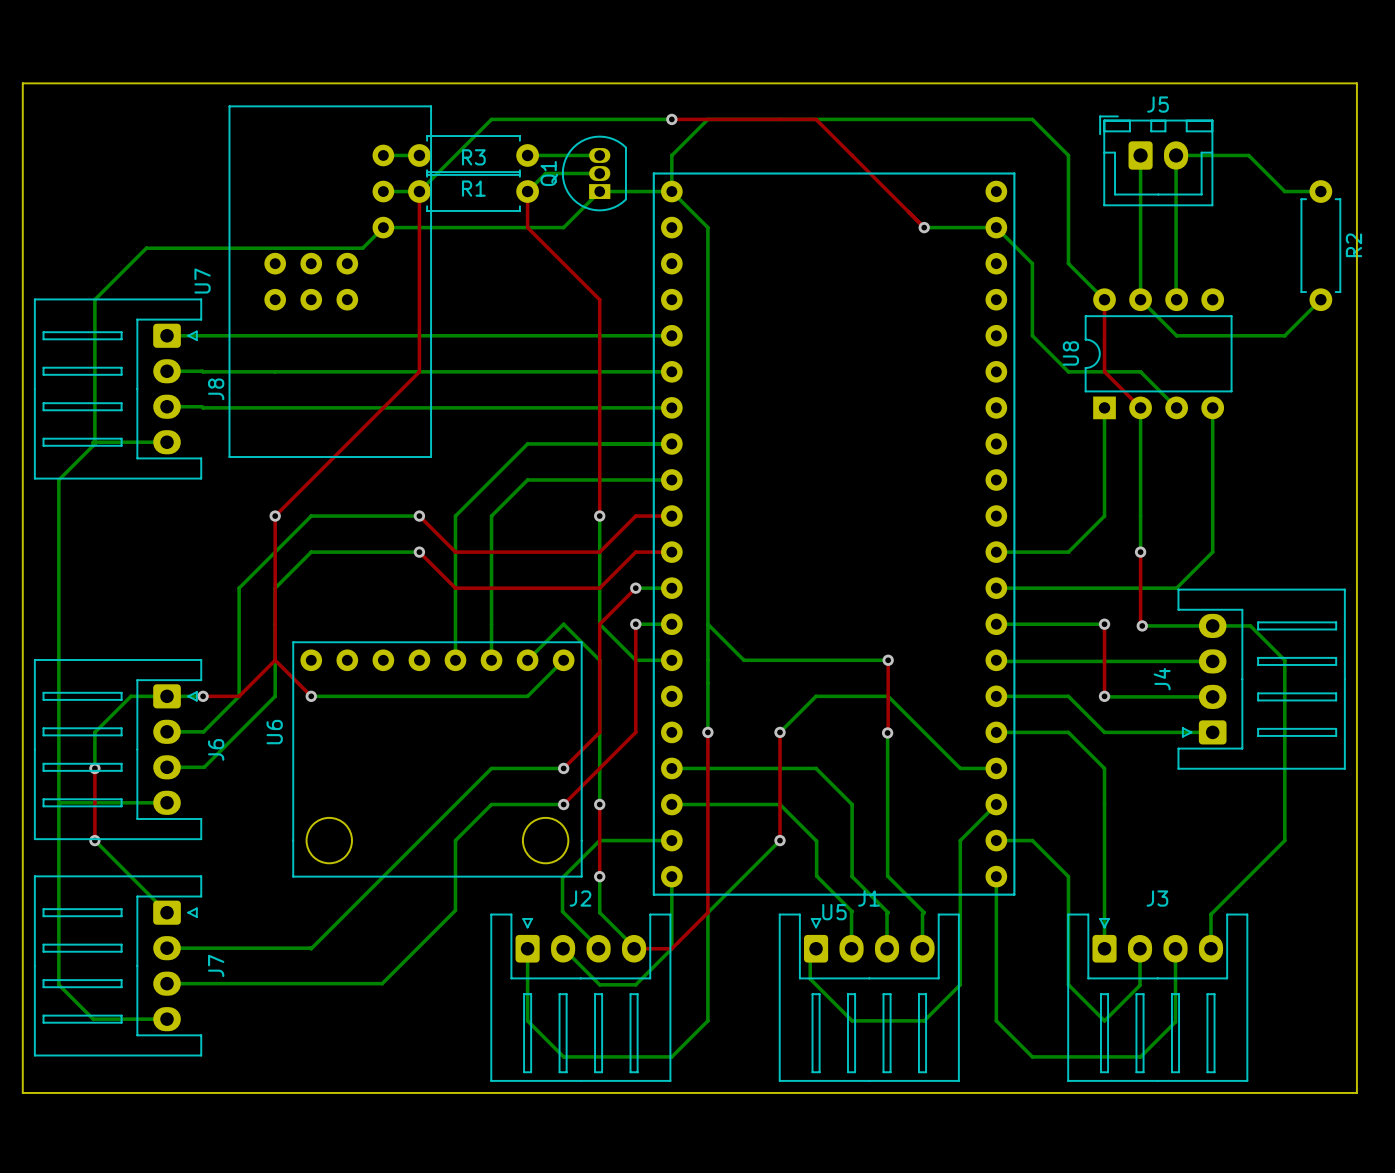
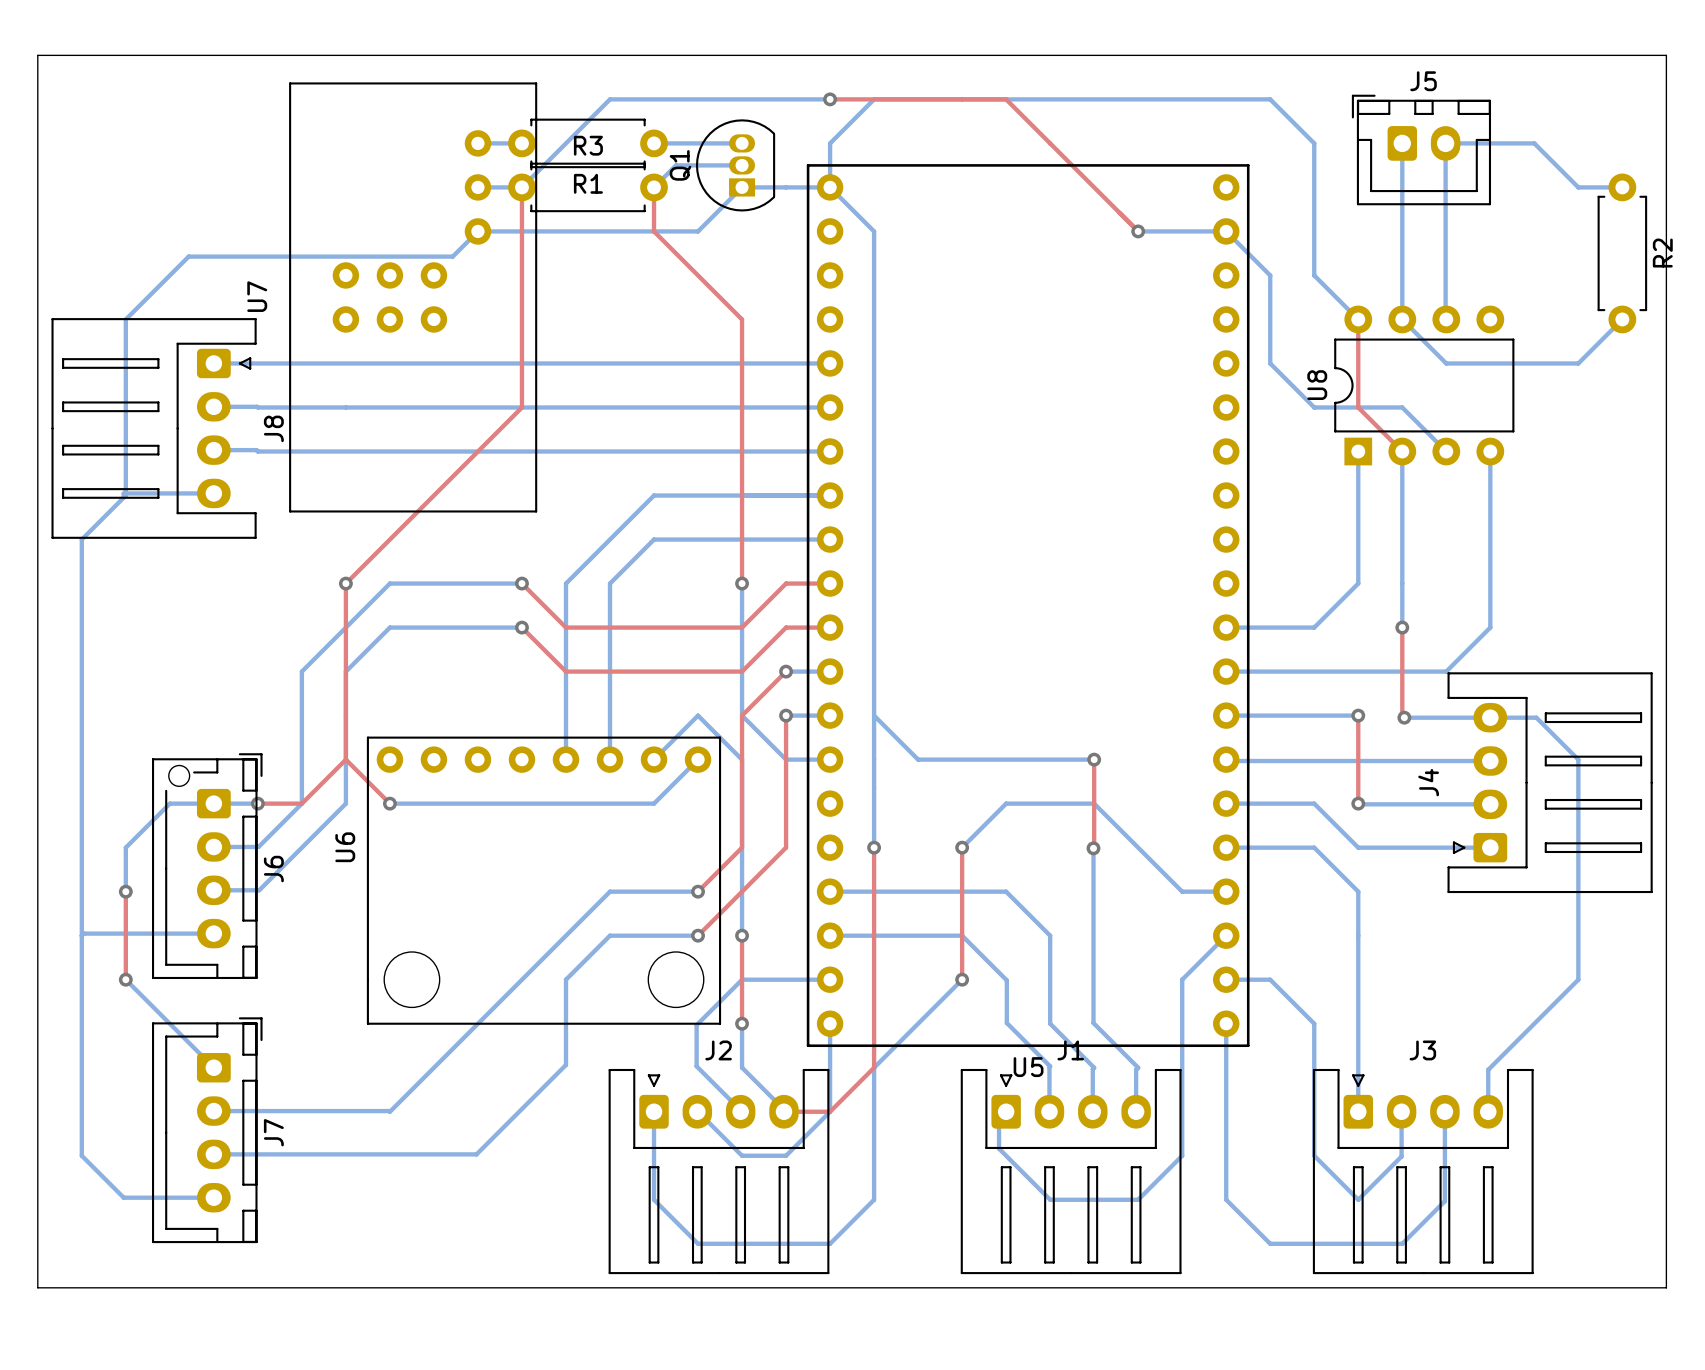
J6 footprint: [34, 659, 203, 841] -> [151, 753, 263, 980]
J7 footprint: [34, 875, 203, 1057] -> [151, 1017, 263, 1244]

